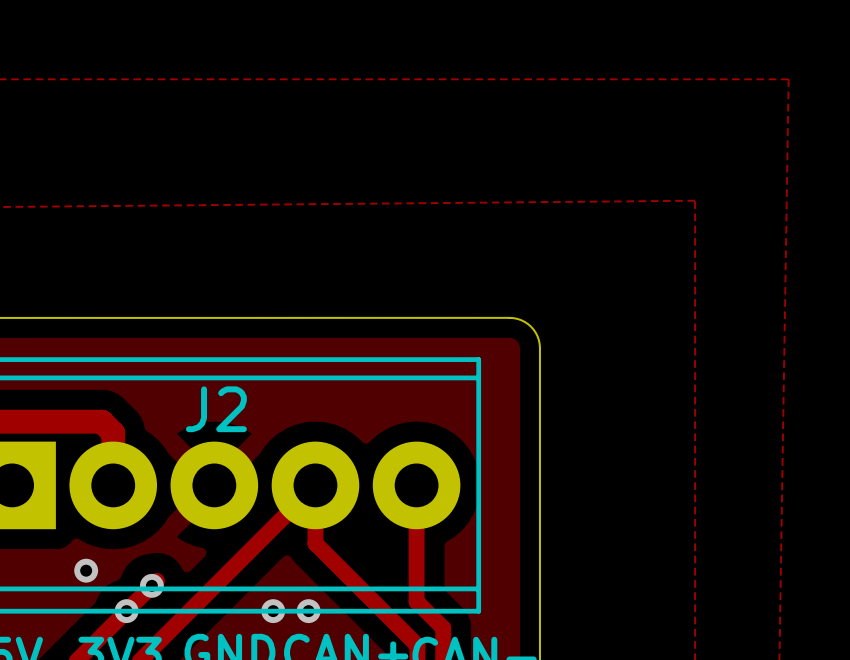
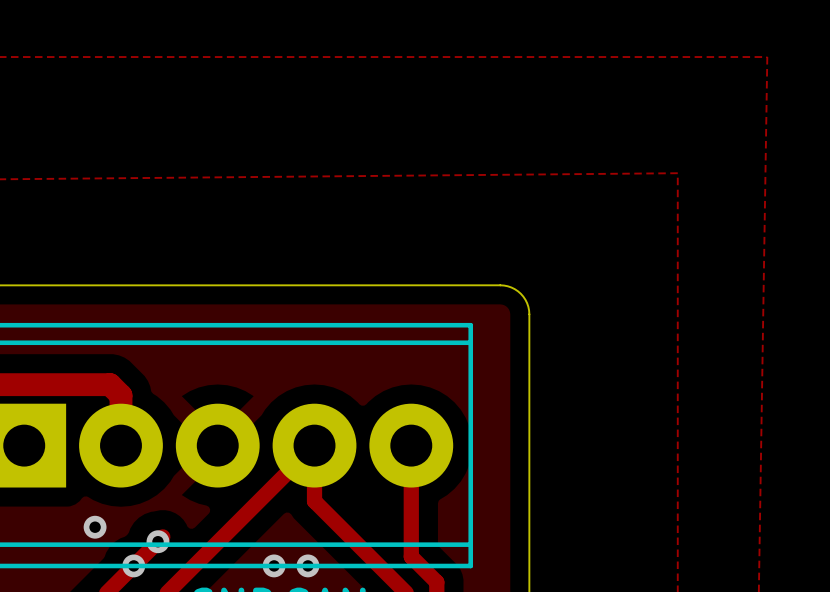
J2 name: J2 (216, 409) -> none

